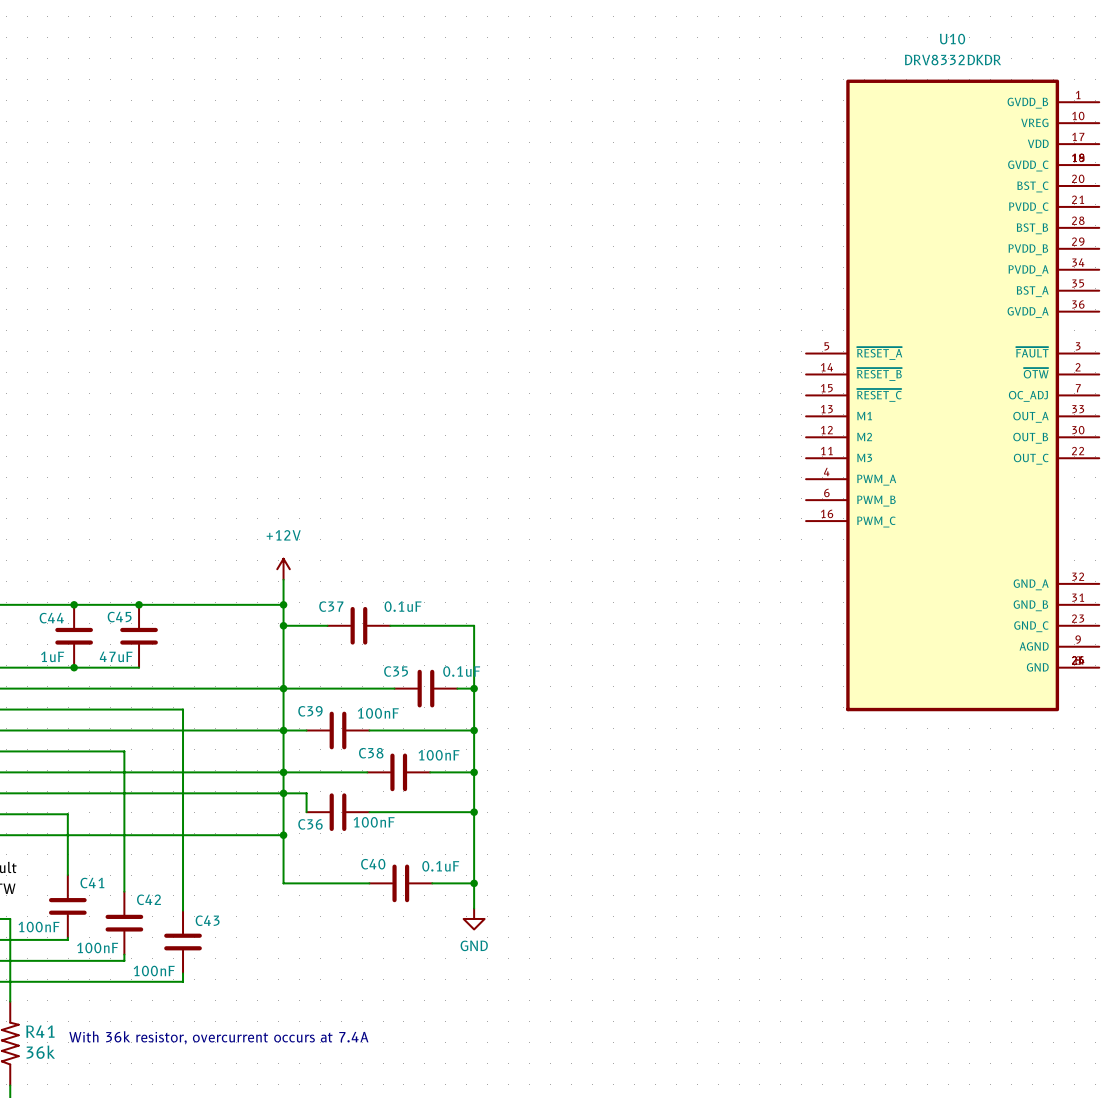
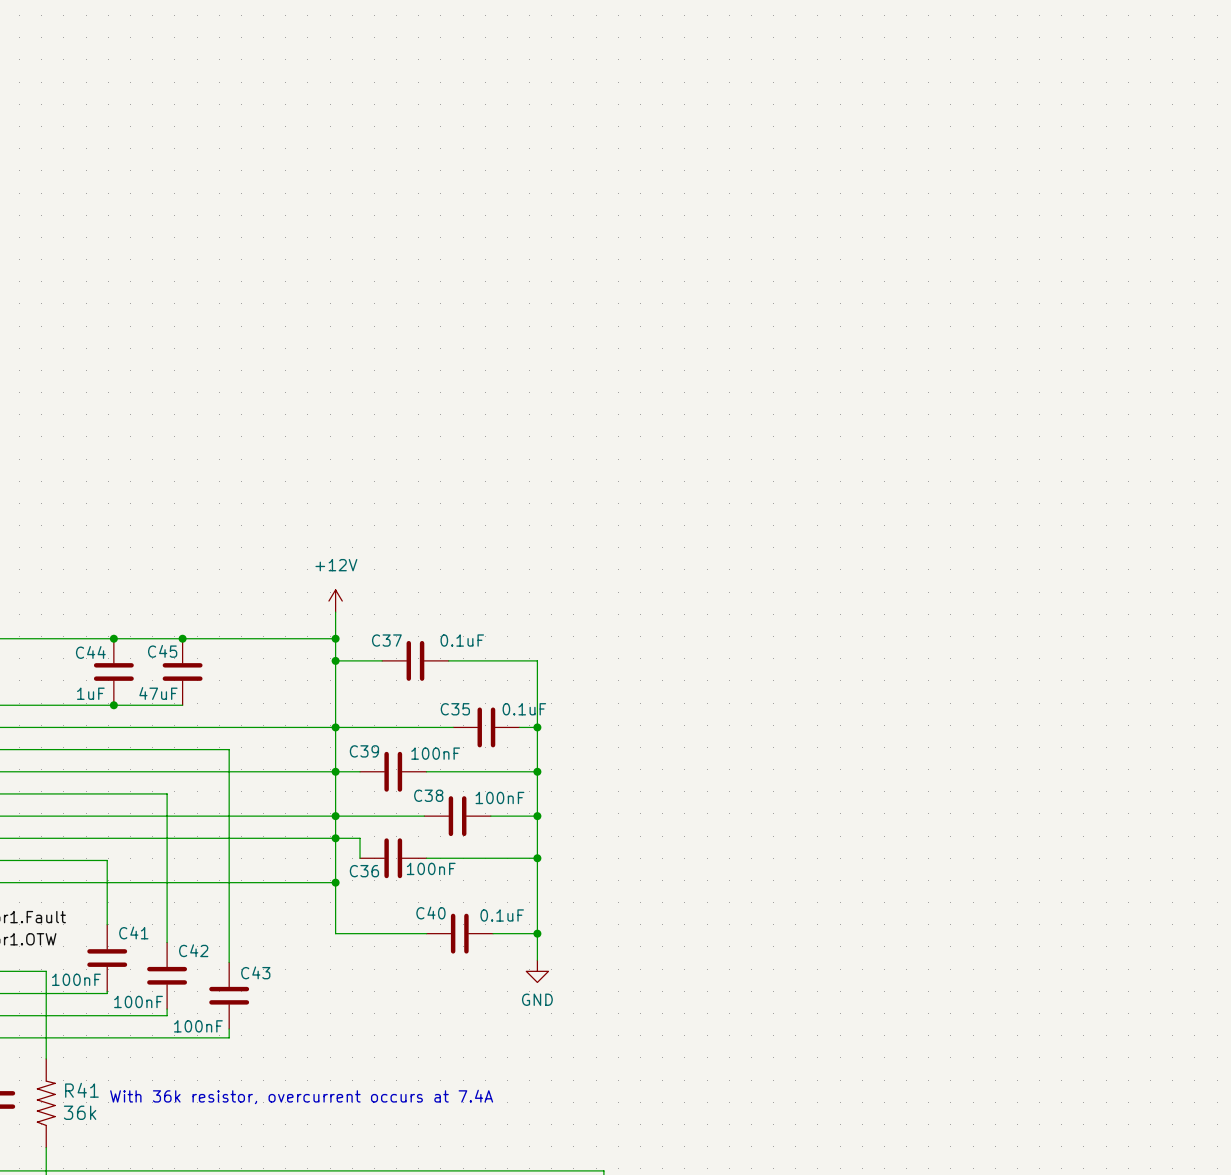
U10: DRV8332DKDR (952, 395) -> none

